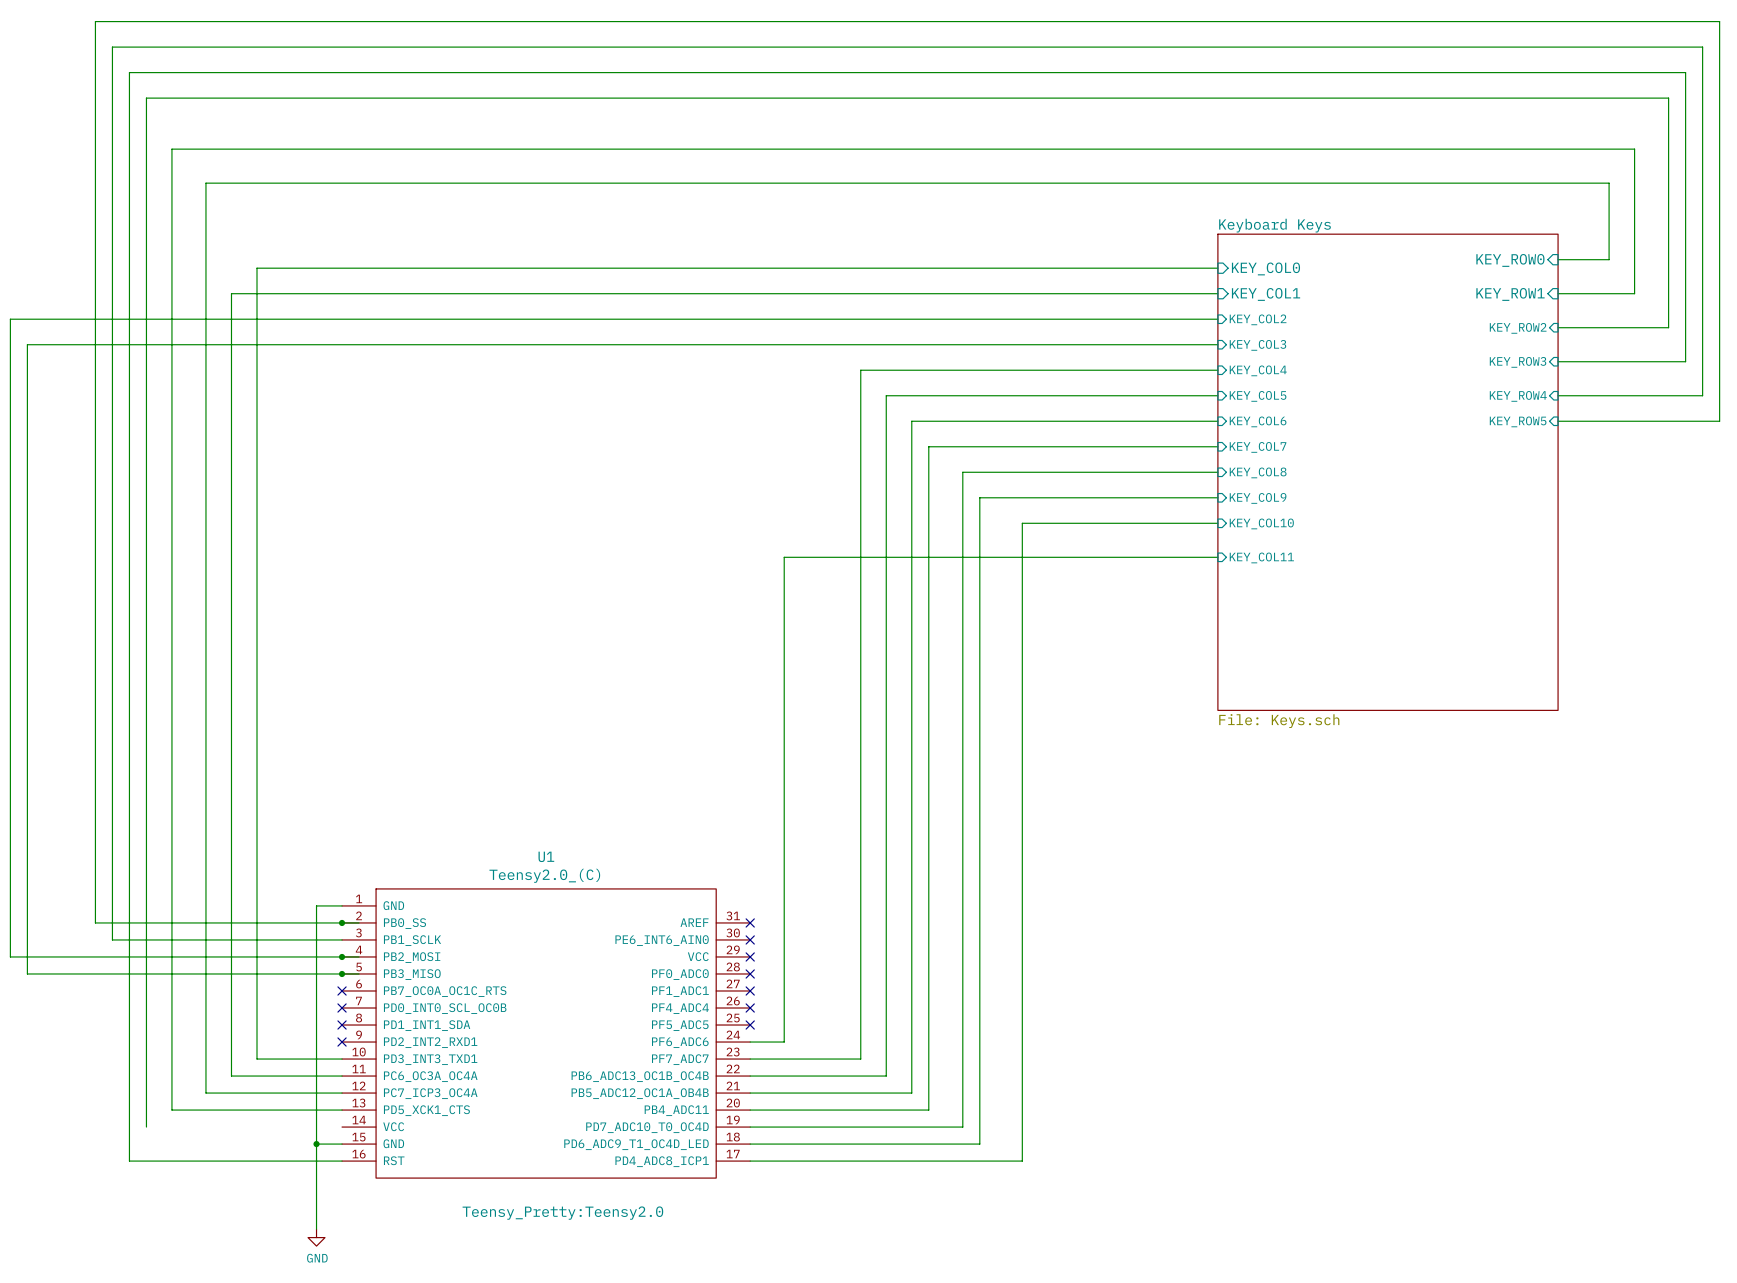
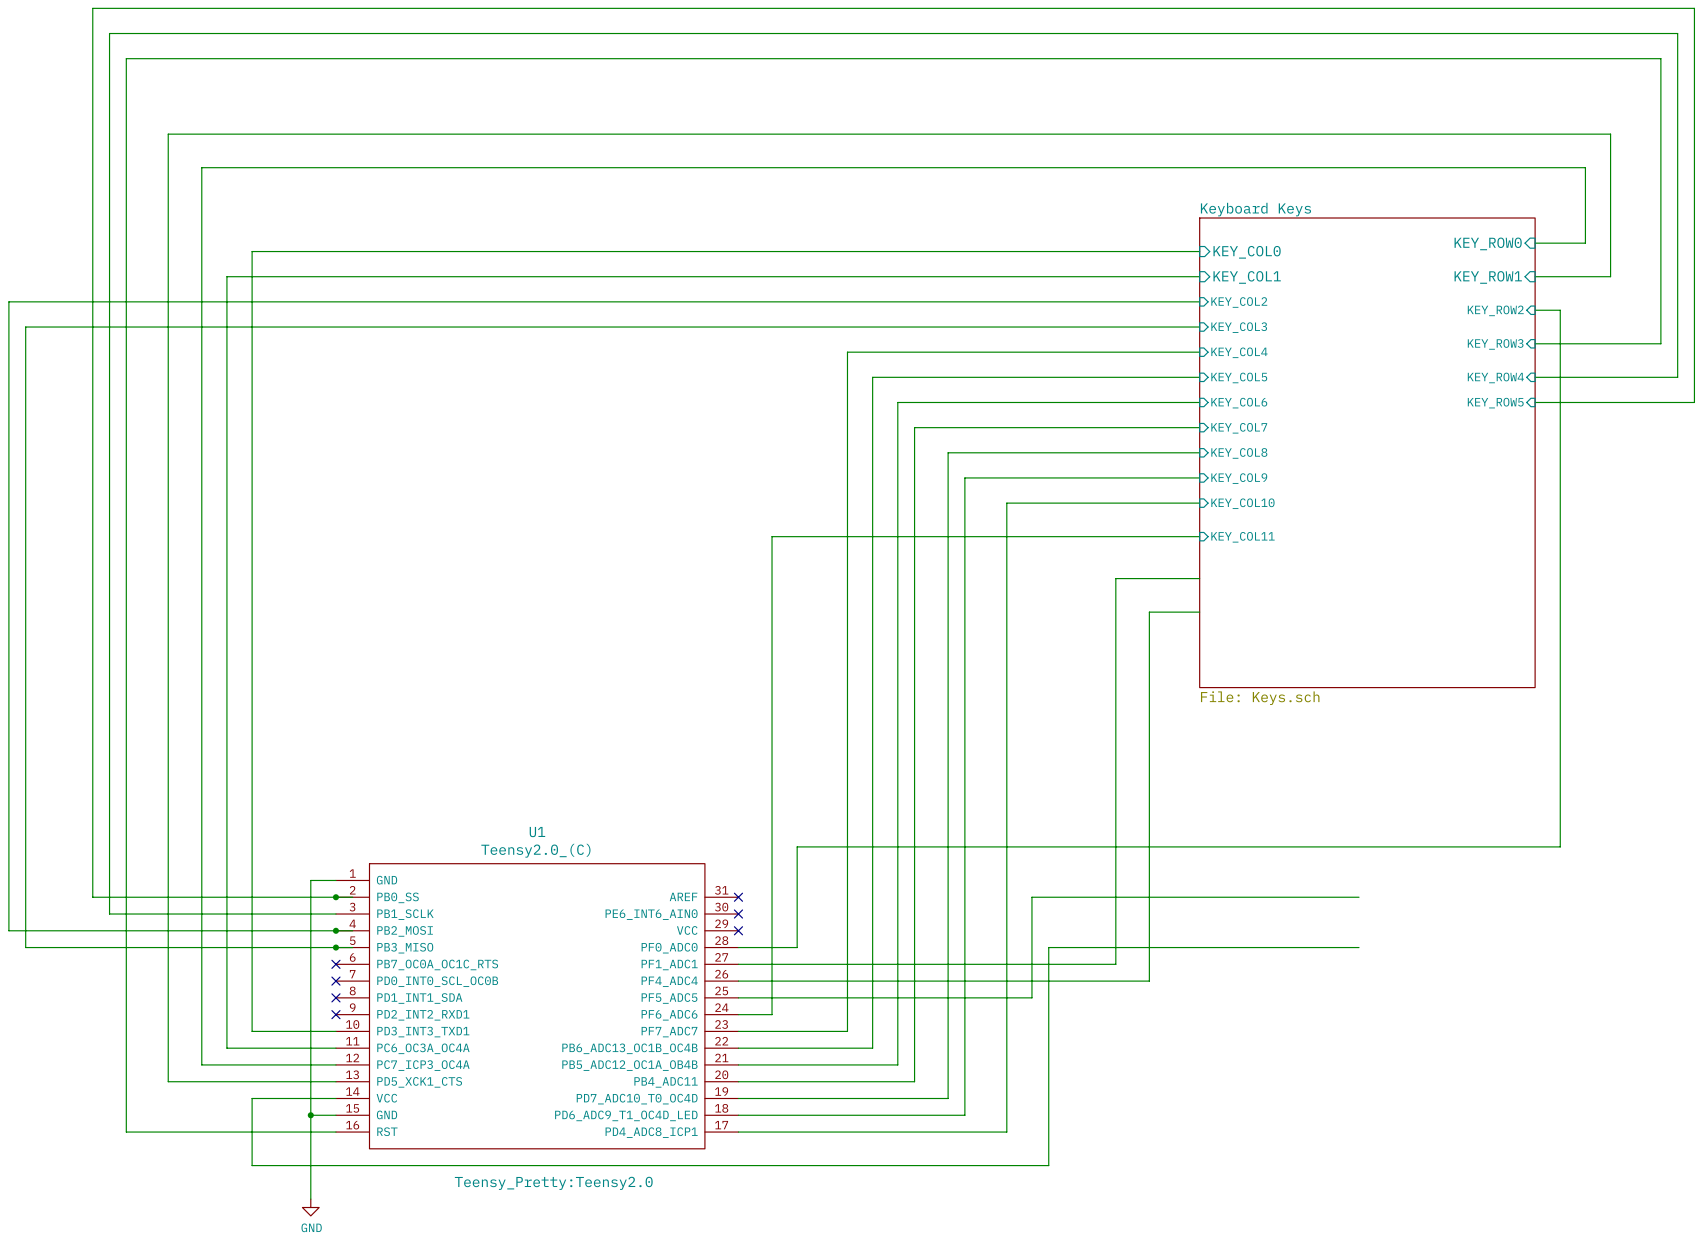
wire: (1583, 327) (1668, 327) (1668, 98) (146, 98) (146, 1127) -> (1560, 310) (1560, 846) (797, 846) (797, 947) (738, 947)
wire: none -> (1199, 578) (1115, 578) (1115, 964) (738, 964)
wire: none -> (1199, 612) (1149, 612) (1149, 981) (738, 981)
wire: none -> (1359, 897) (1031, 897) (1031, 997) (738, 997)
no-connect mark: (750, 973) -> none
wire: none -> (1359, 947) (1048, 947) (1048, 1165) (252, 1165) (252, 1098) (335, 1098)
no-connect mark: (750, 990) -> none
no-connect mark: (750, 1008) -> none
no-connect mark: (750, 1025) -> none

